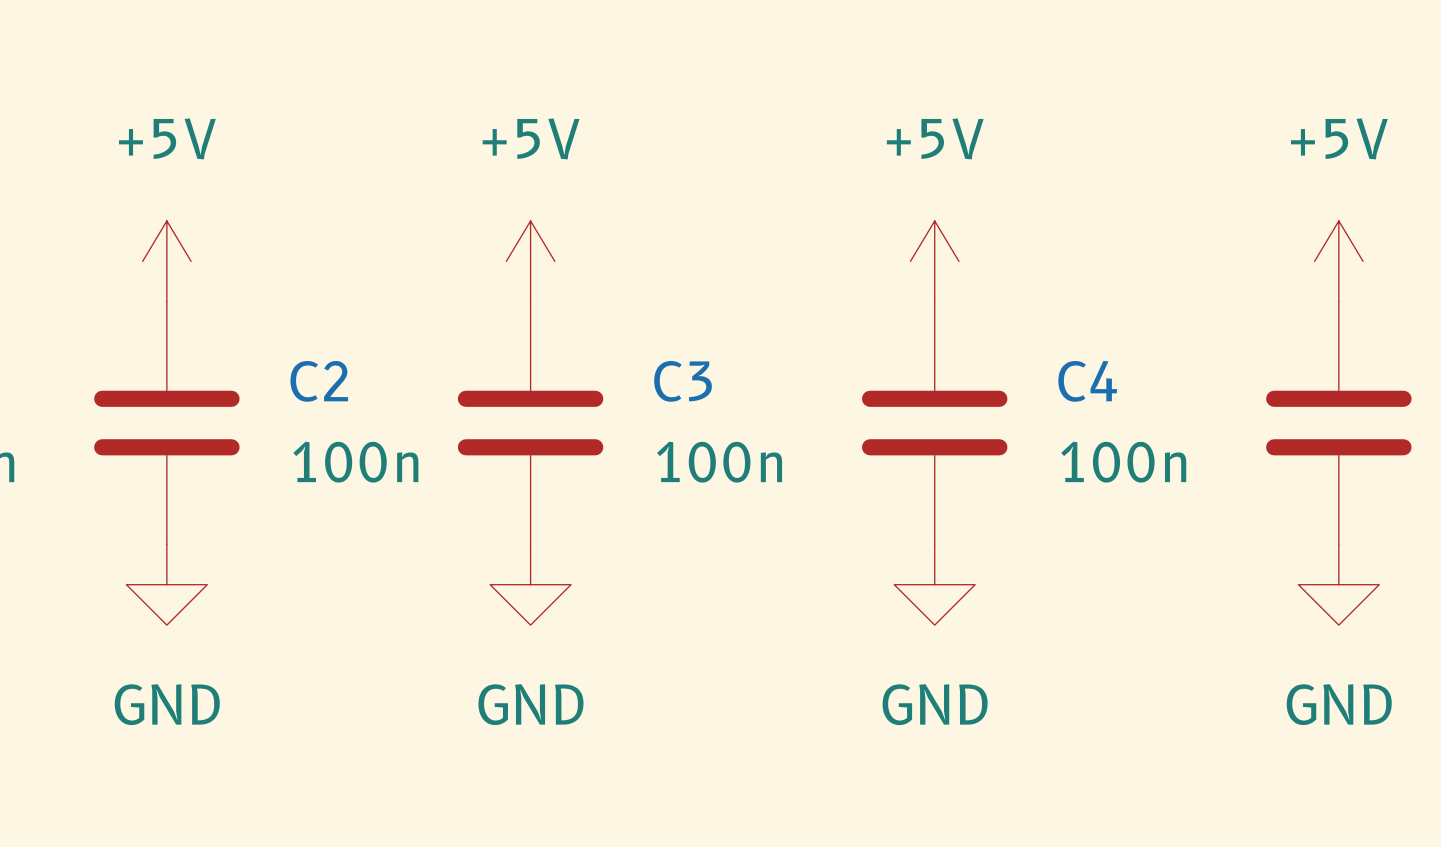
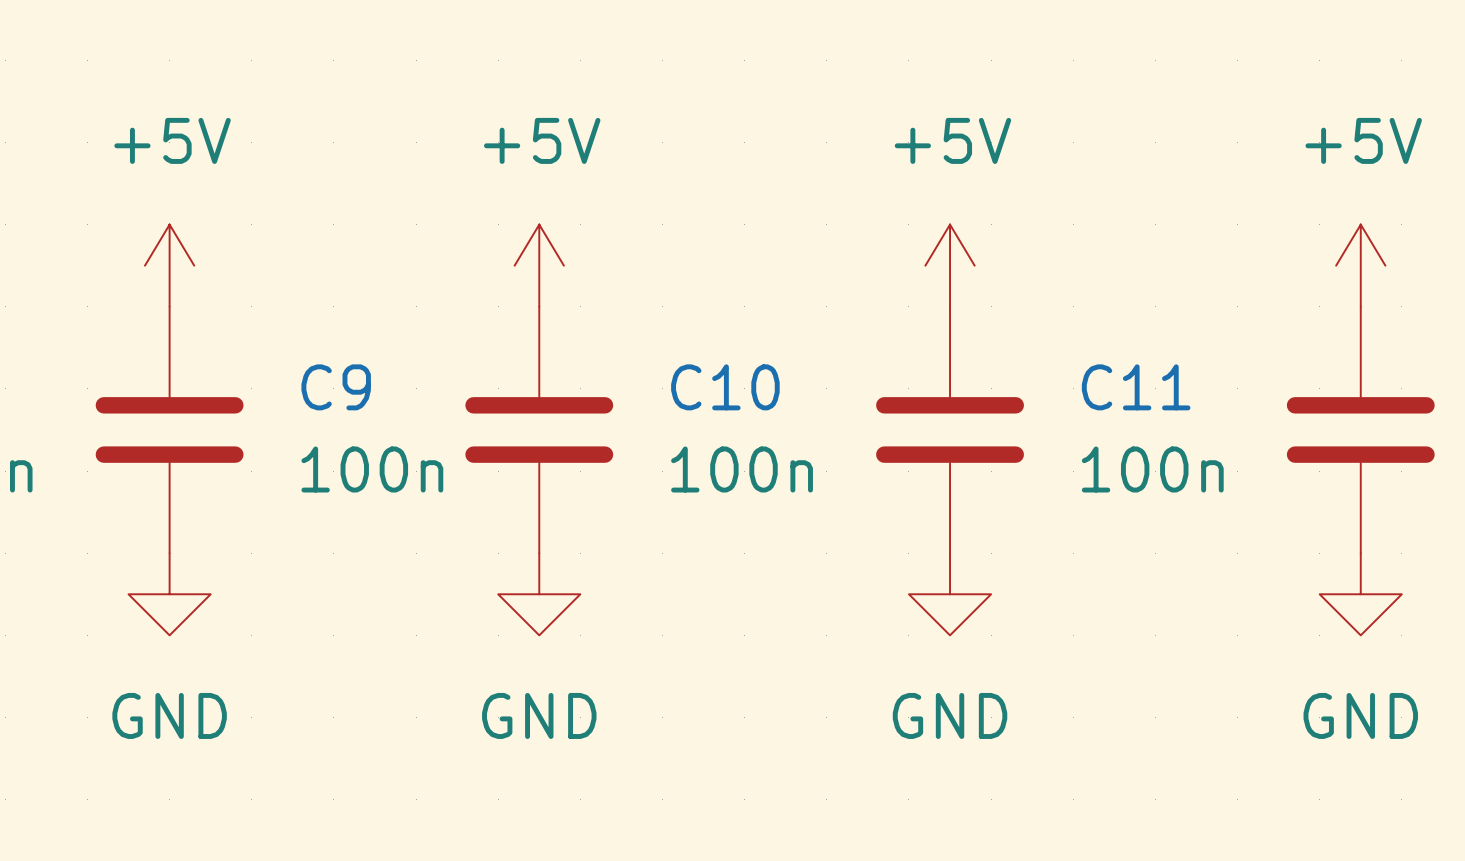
C2 name: C2 (319, 381) -> C9 (336, 387)
C3 name: C3 (683, 381) -> C10 (725, 387)
C4 name: C4 (1087, 381) -> C11 (1136, 387)

